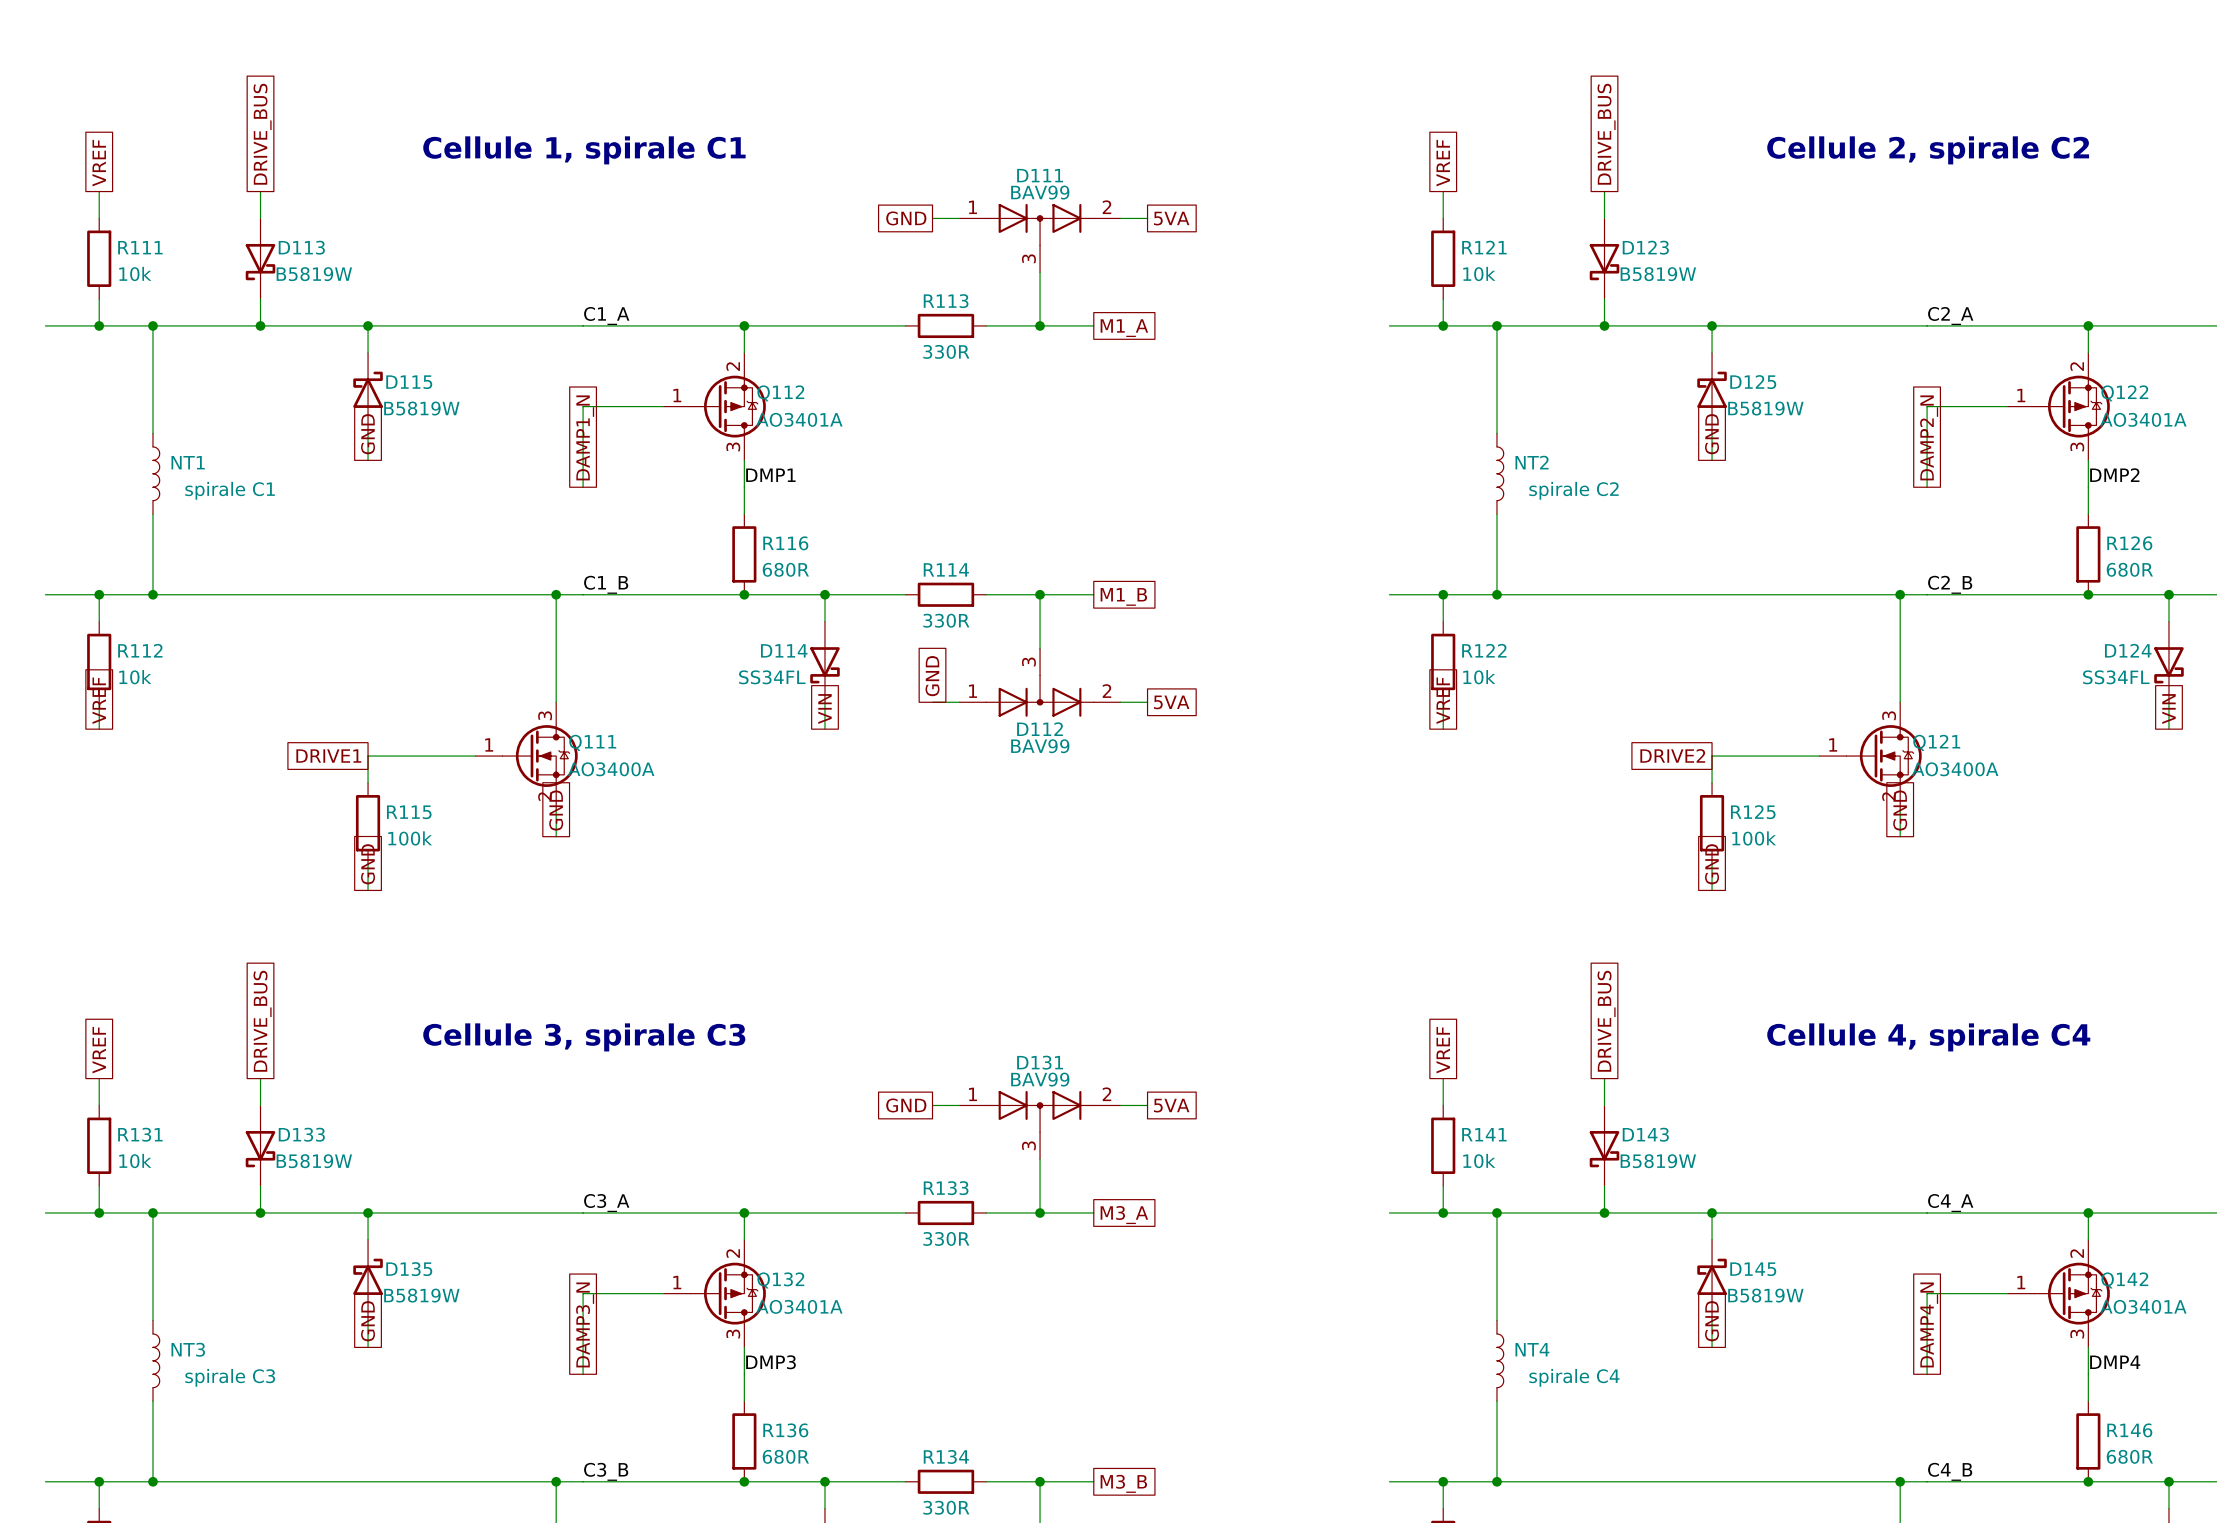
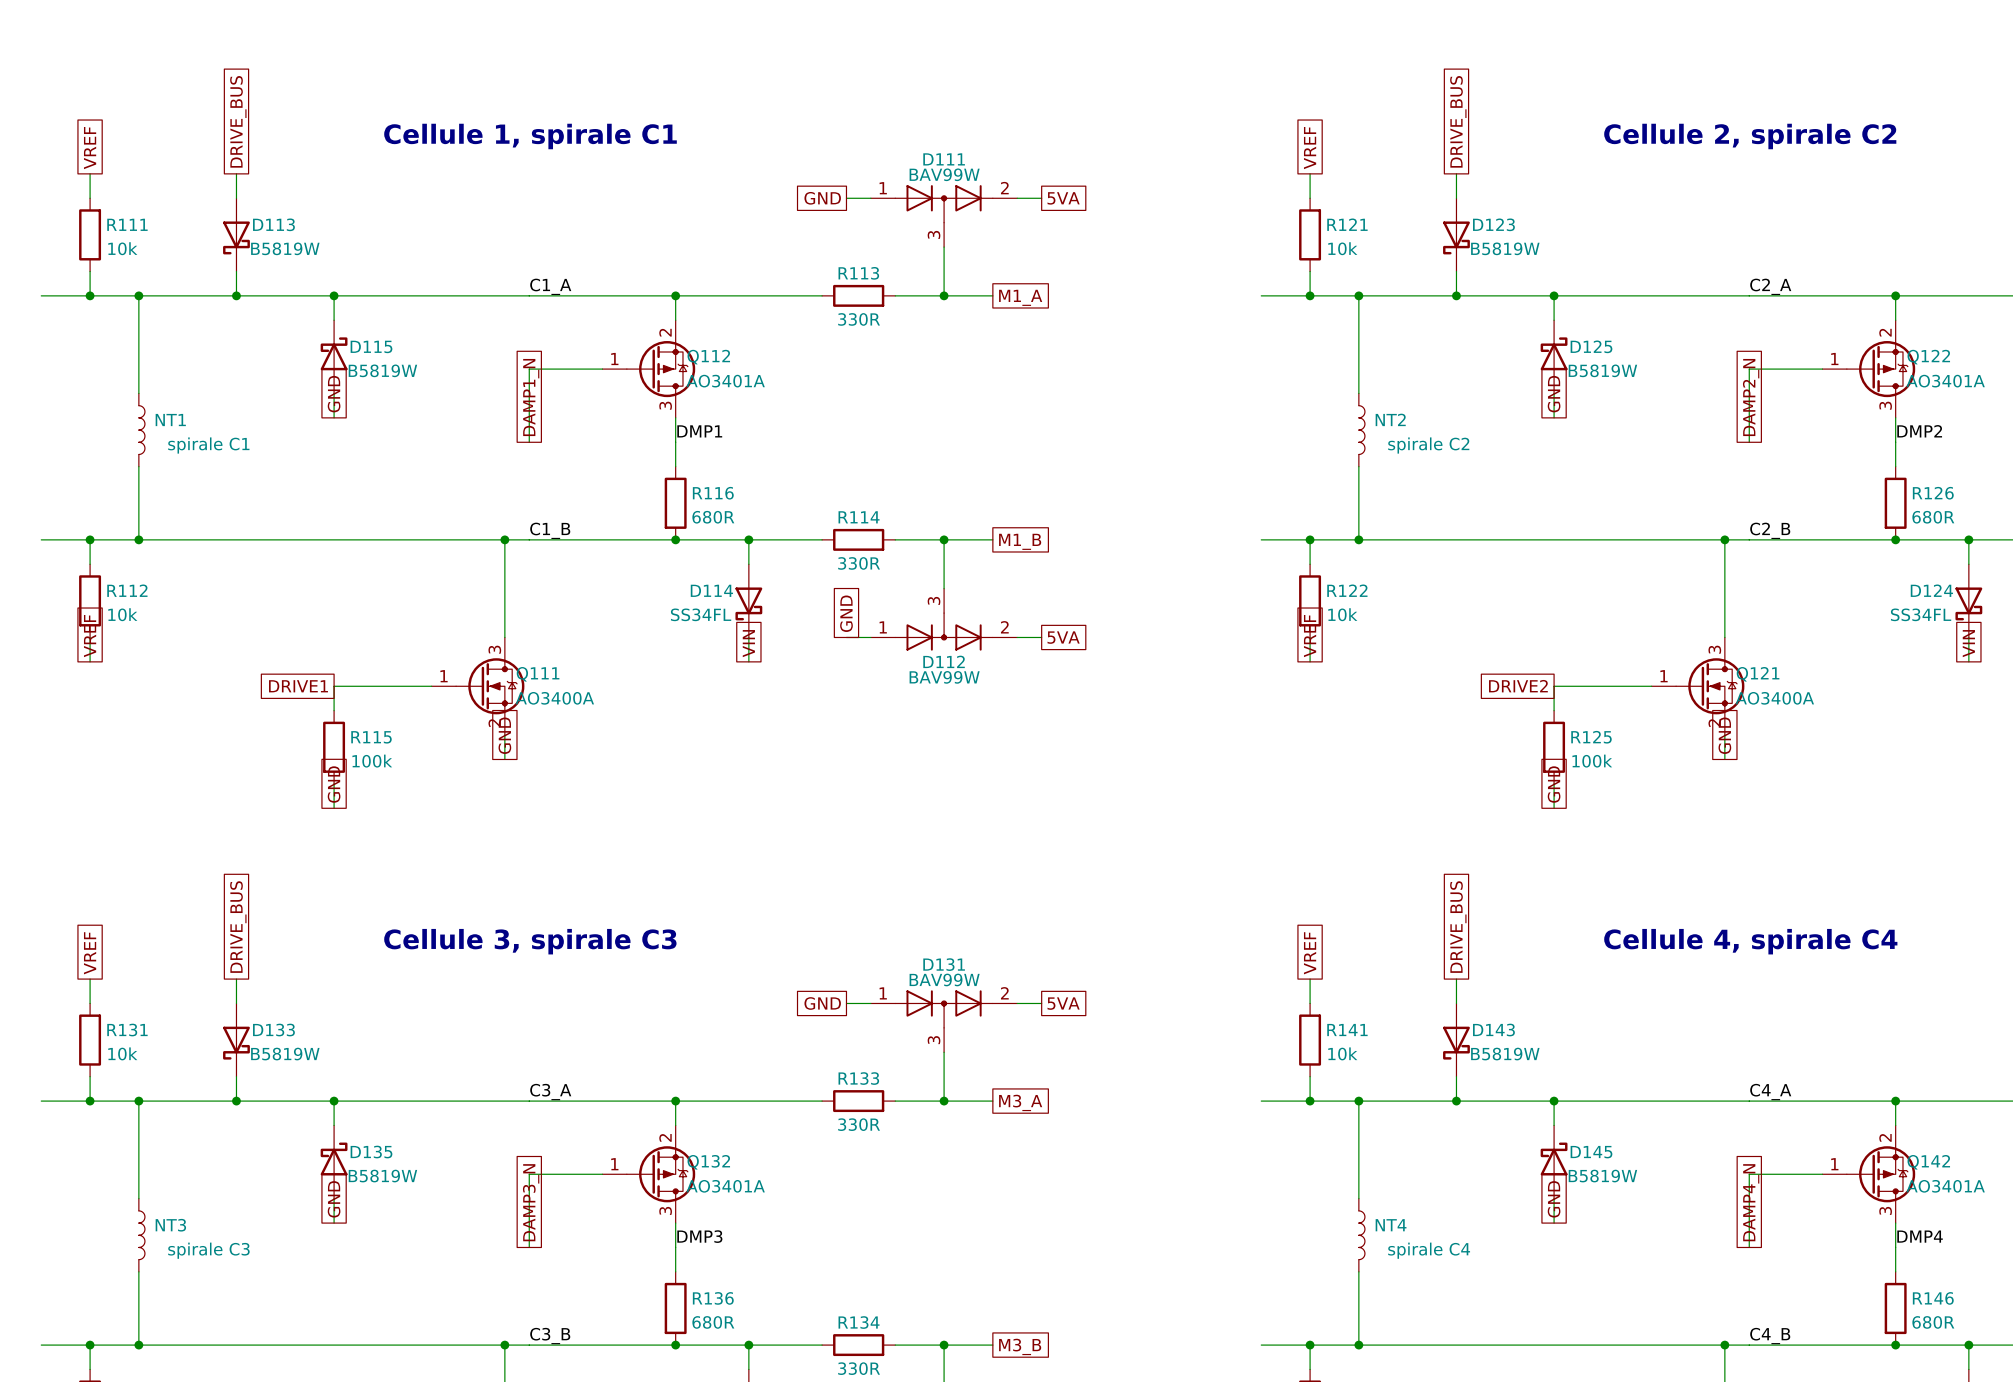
D111 value: BAV99 (1040, 192) -> BAV99W (944, 174)
D112 value: BAV99 (1040, 746) -> BAV99W (944, 677)
D131 value: BAV99 (1040, 1079) -> BAV99W (944, 979)

